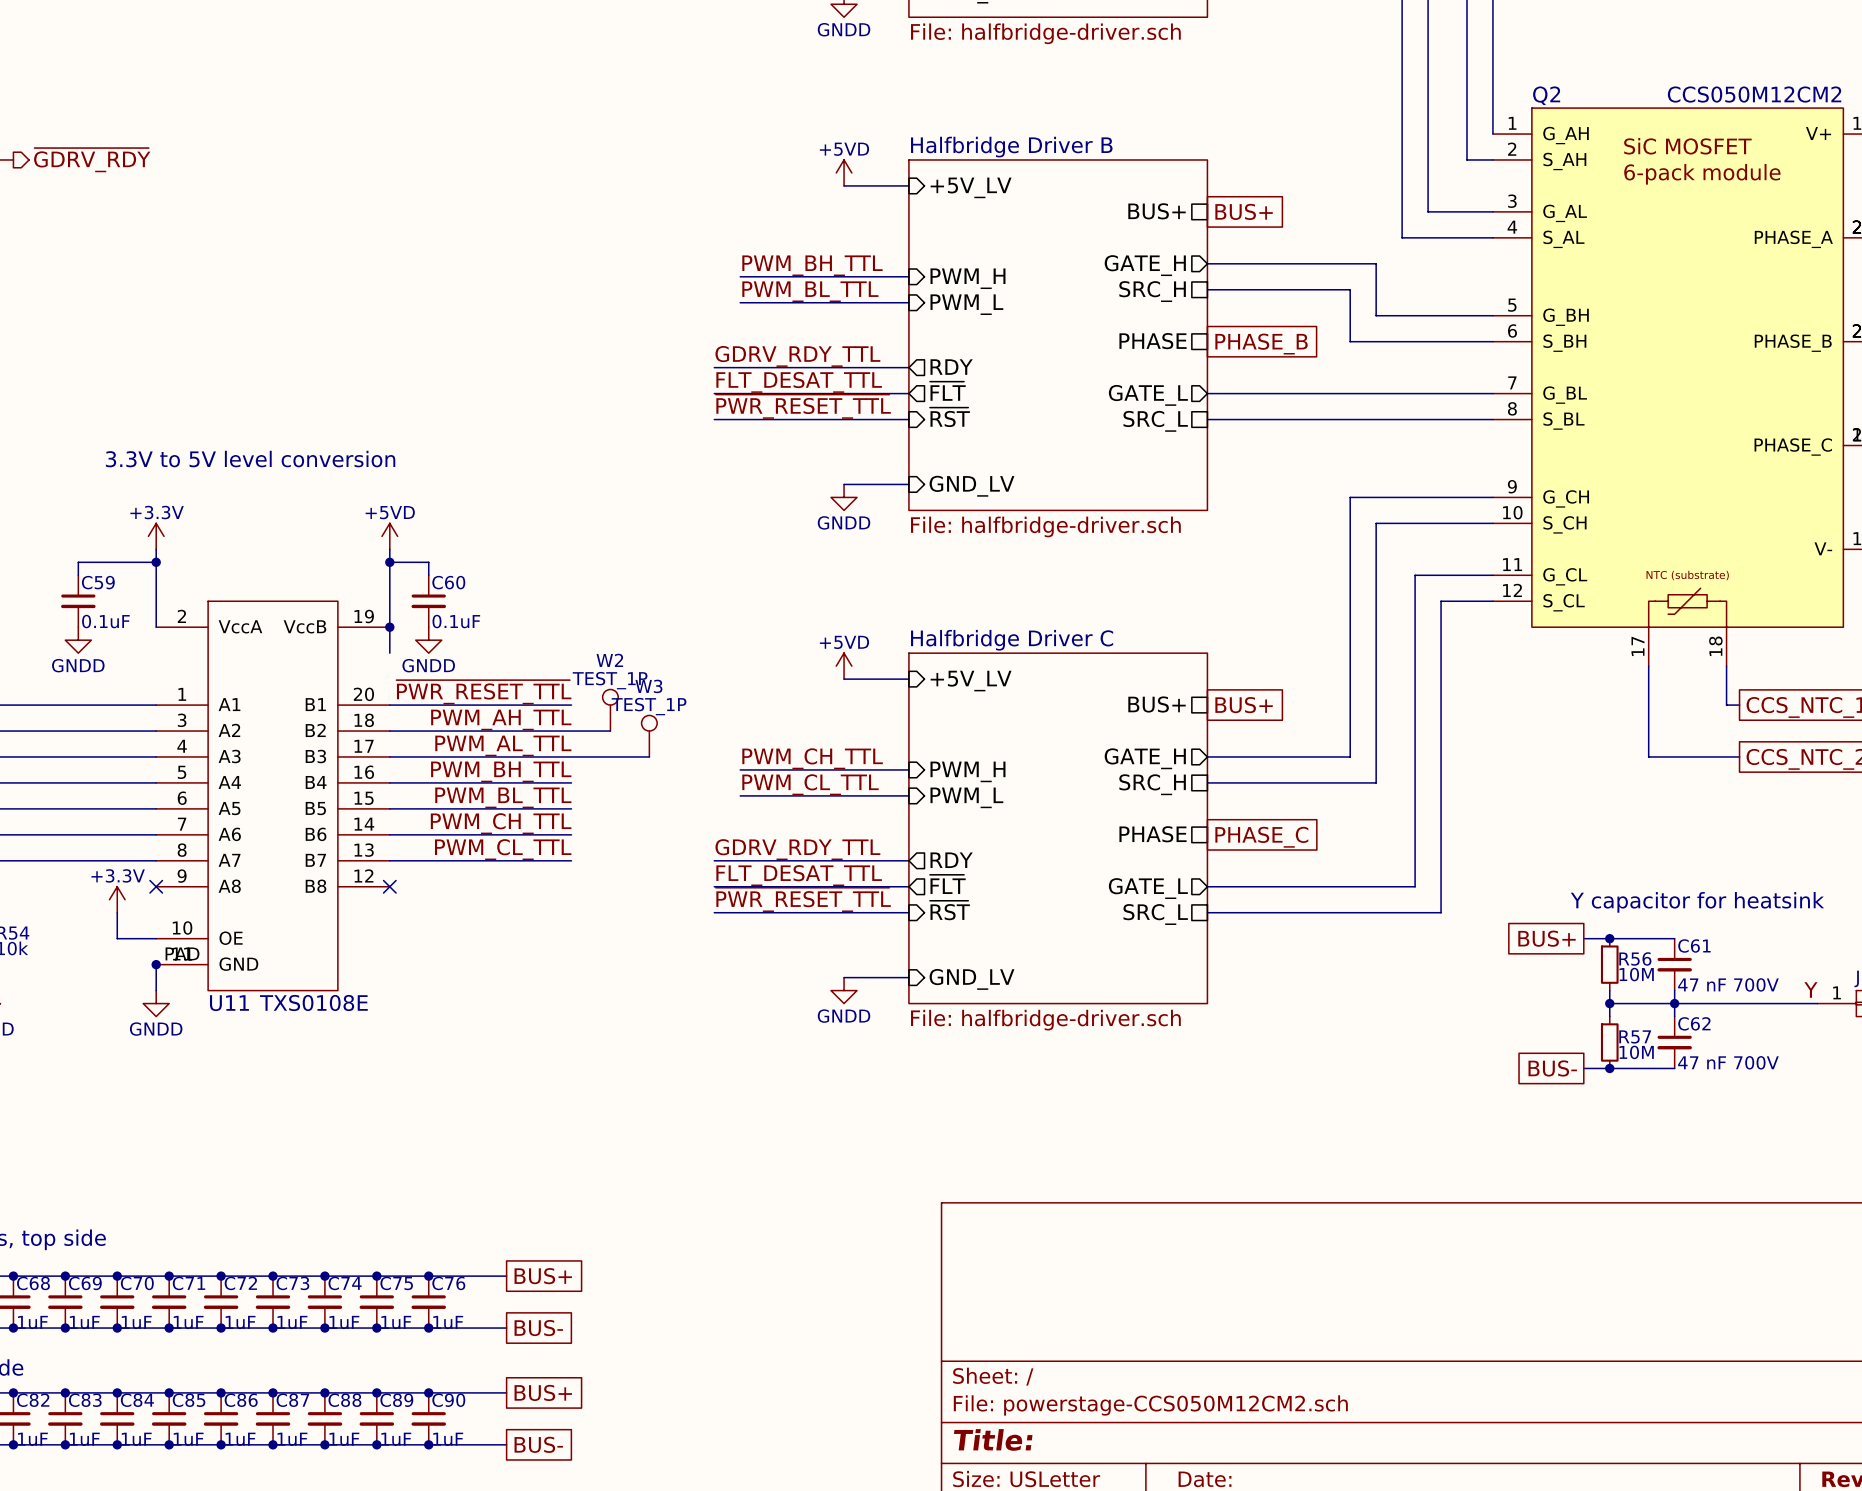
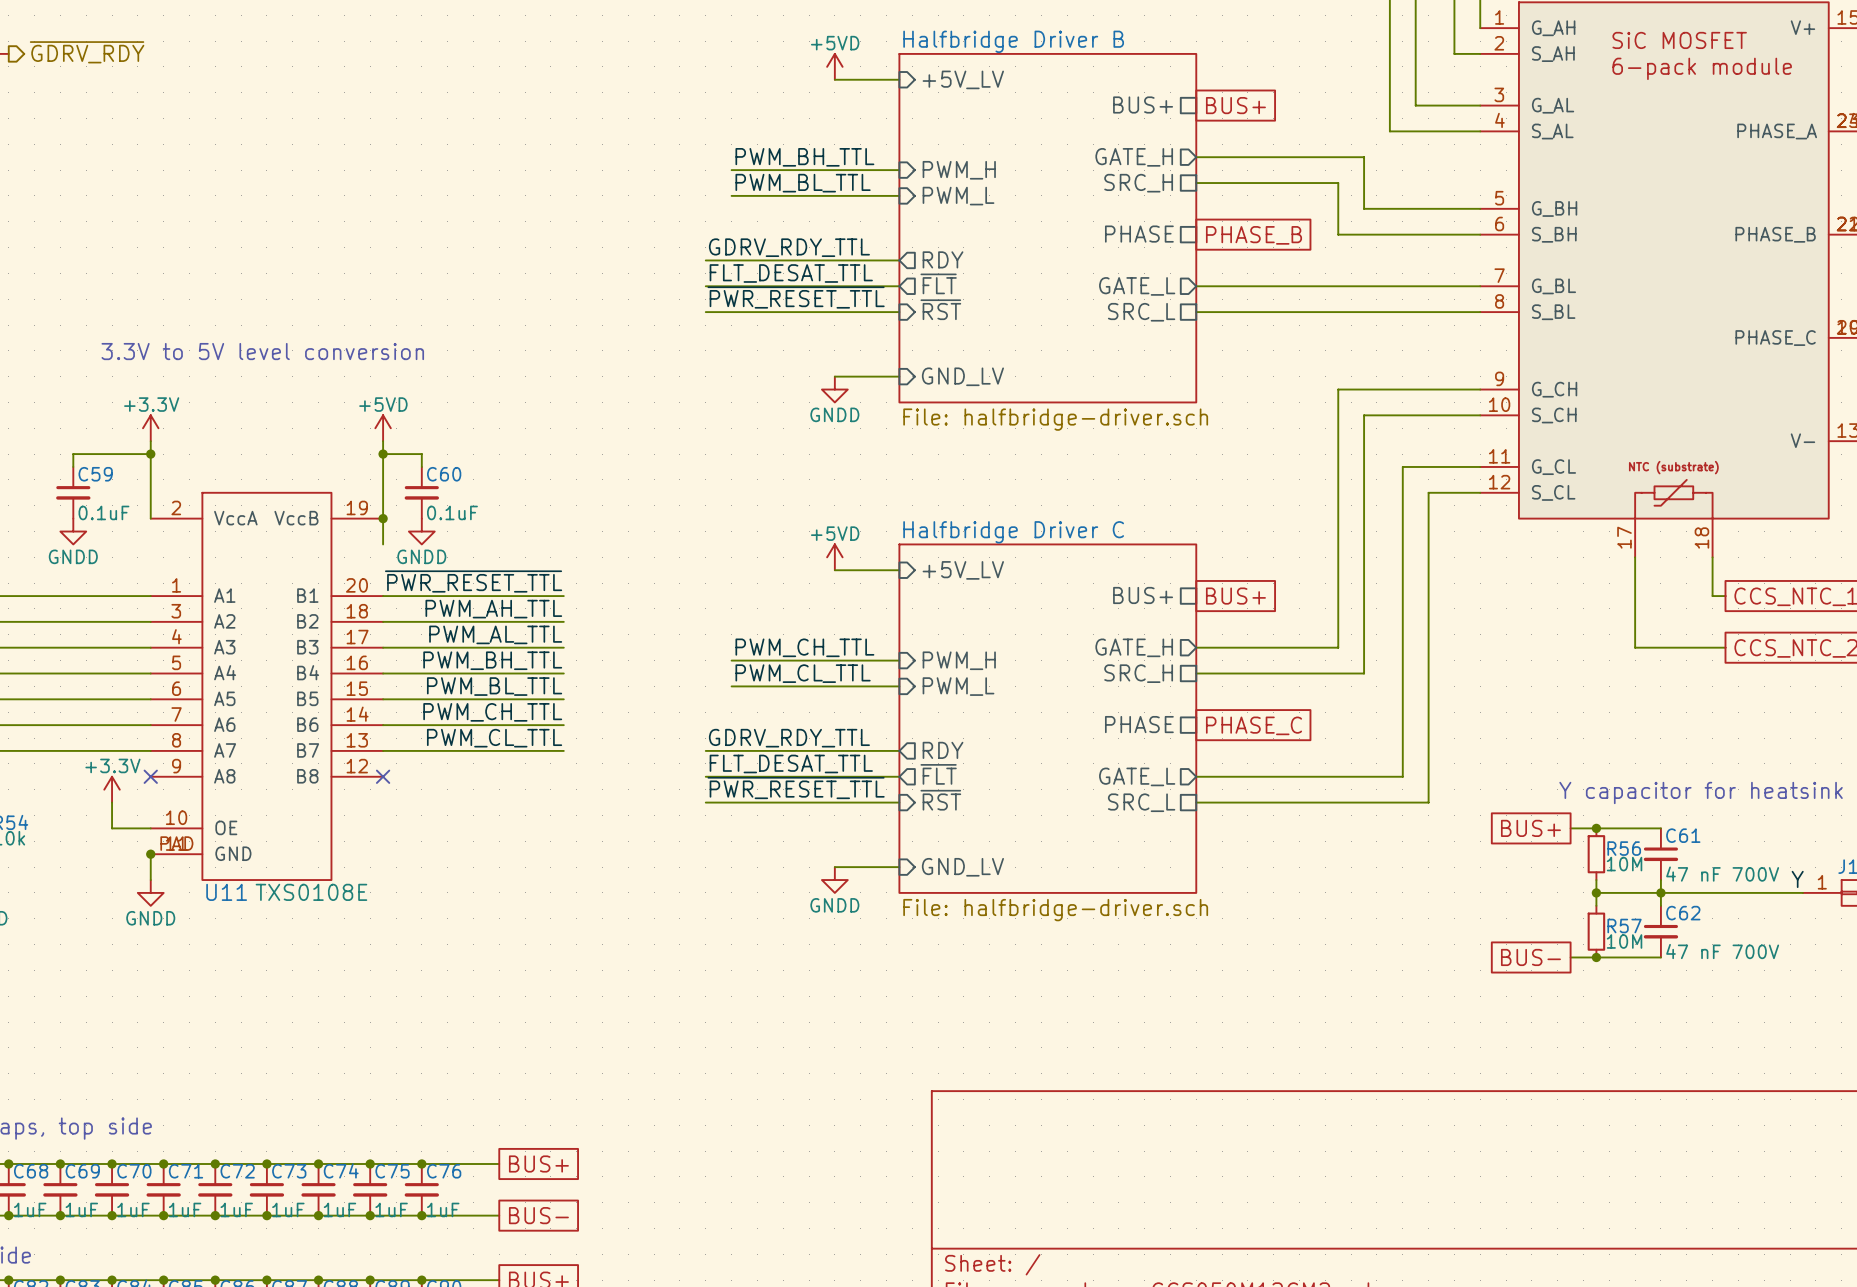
W2: TEST_1P (610, 710) -> none
wire: (571, 731) (610, 731) -> none
W3: TEST_1P (649, 736) -> none
wire: (571, 756) (649, 756) -> none

